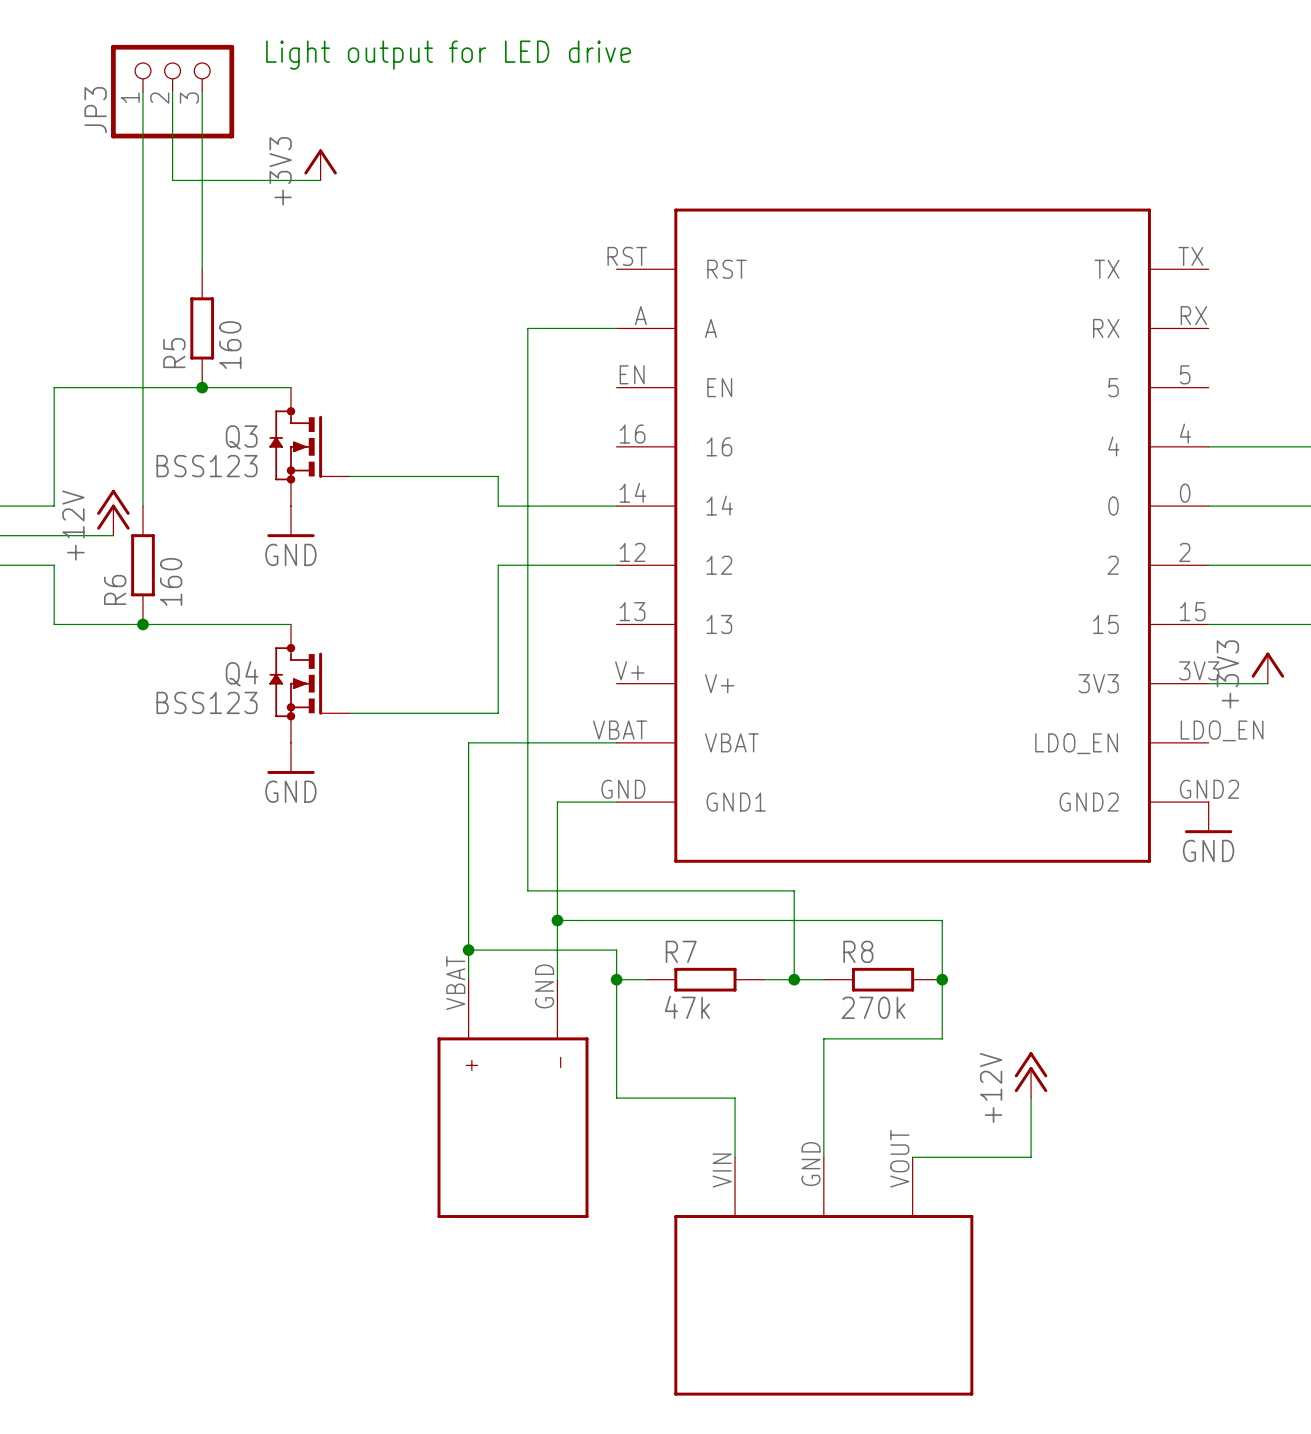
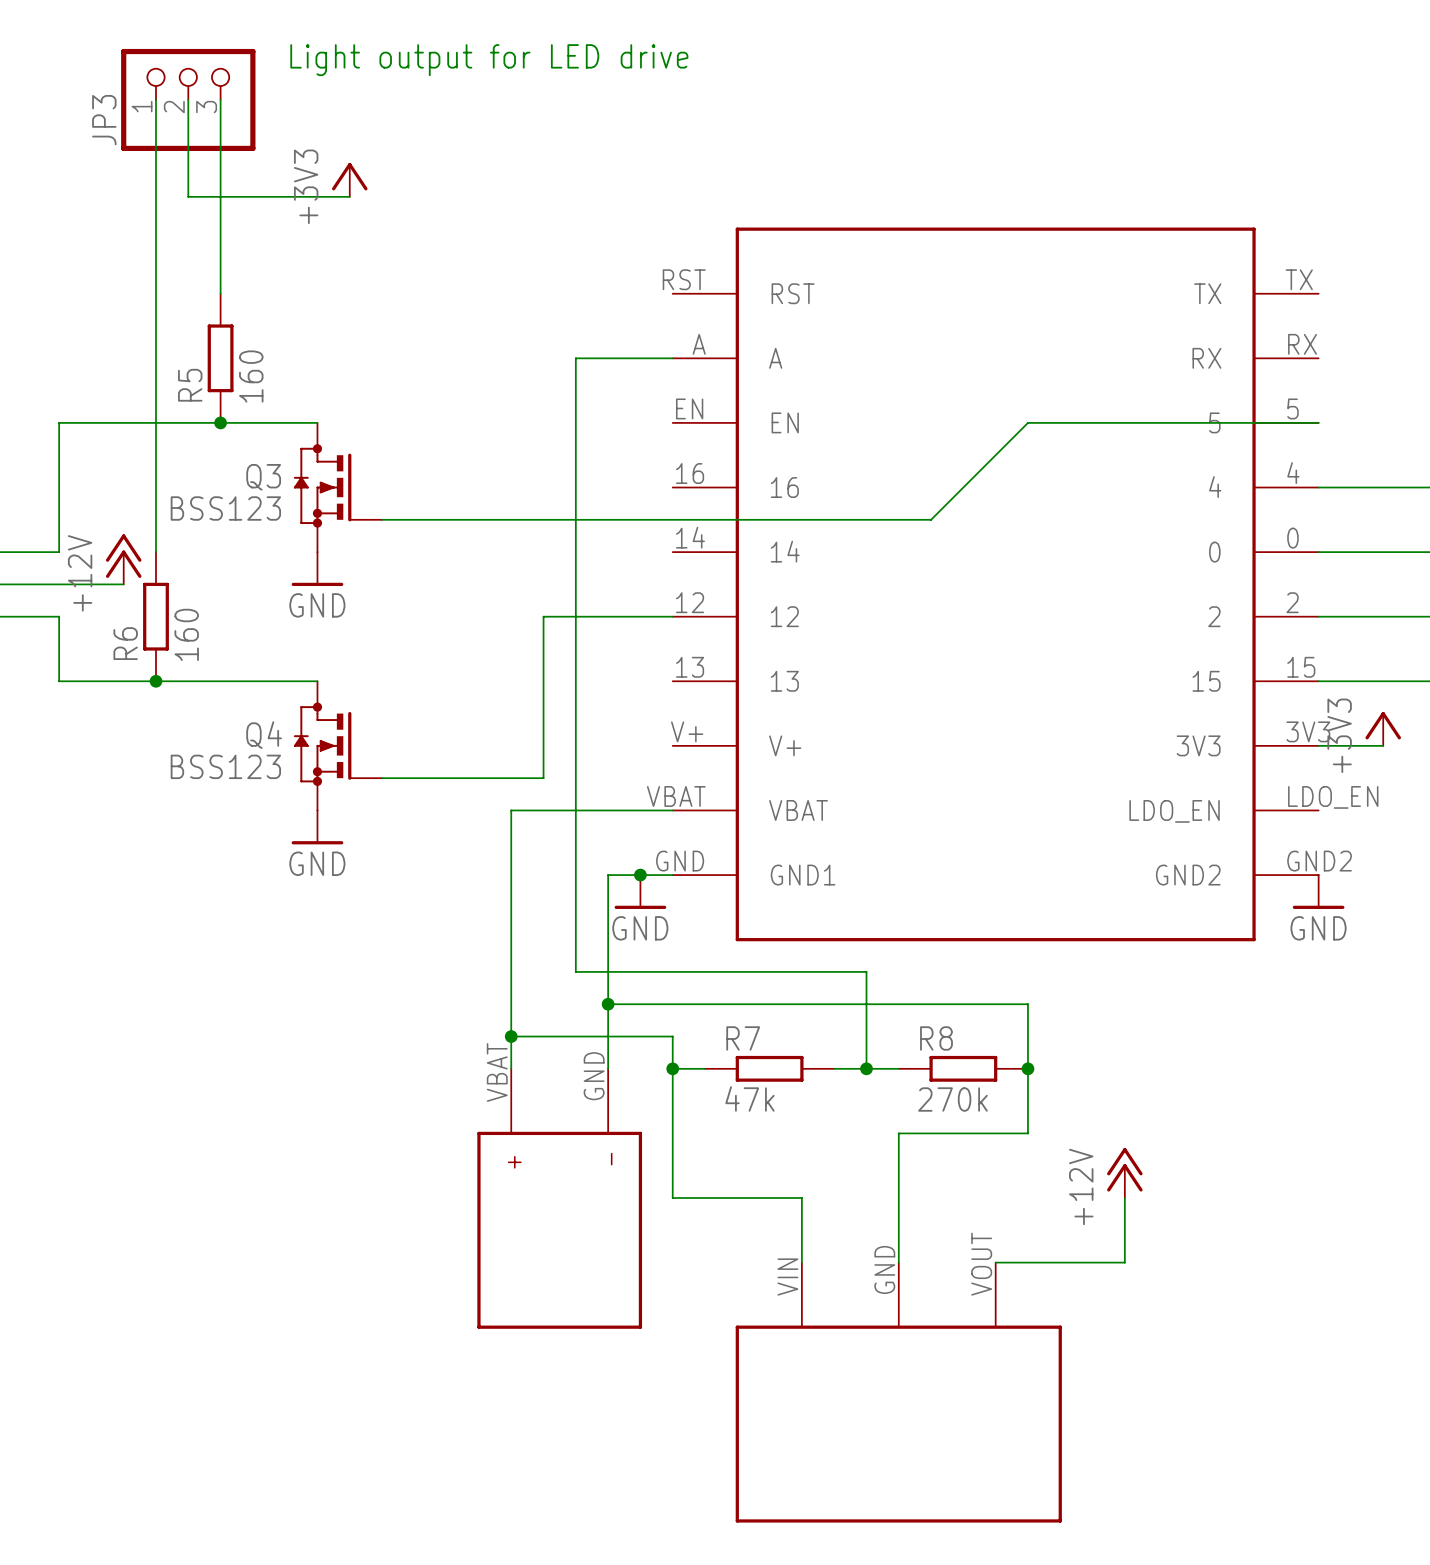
wire: (498, 476) (498, 506) (616, 506) -> (543, 519) (931, 519) (1027, 422) (1318, 422)
junction: none -> (640, 875)
power symbol: none -> GND (640, 892)

